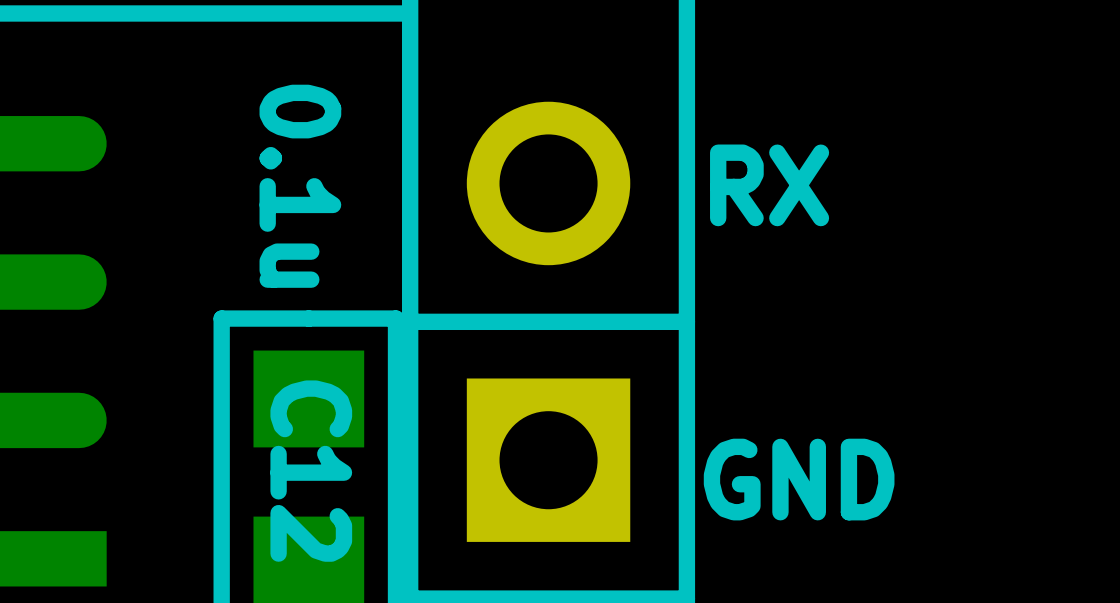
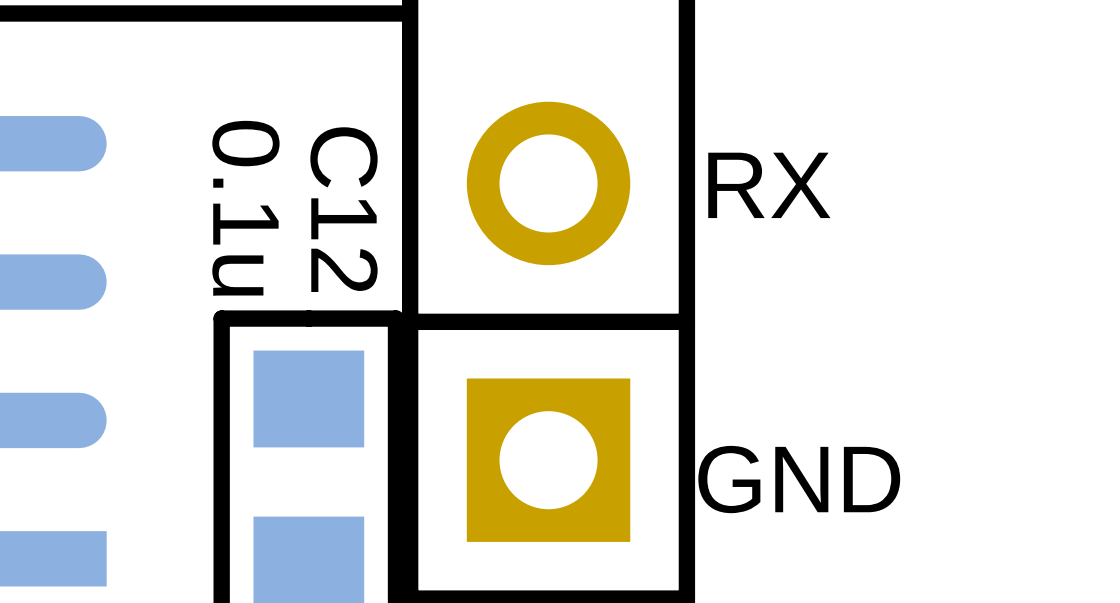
C12 value position: 0.1u (300, 186) -> 0.1u (245, 208)
C12 name position: C12 (311, 471) -> C12 (343, 209)

